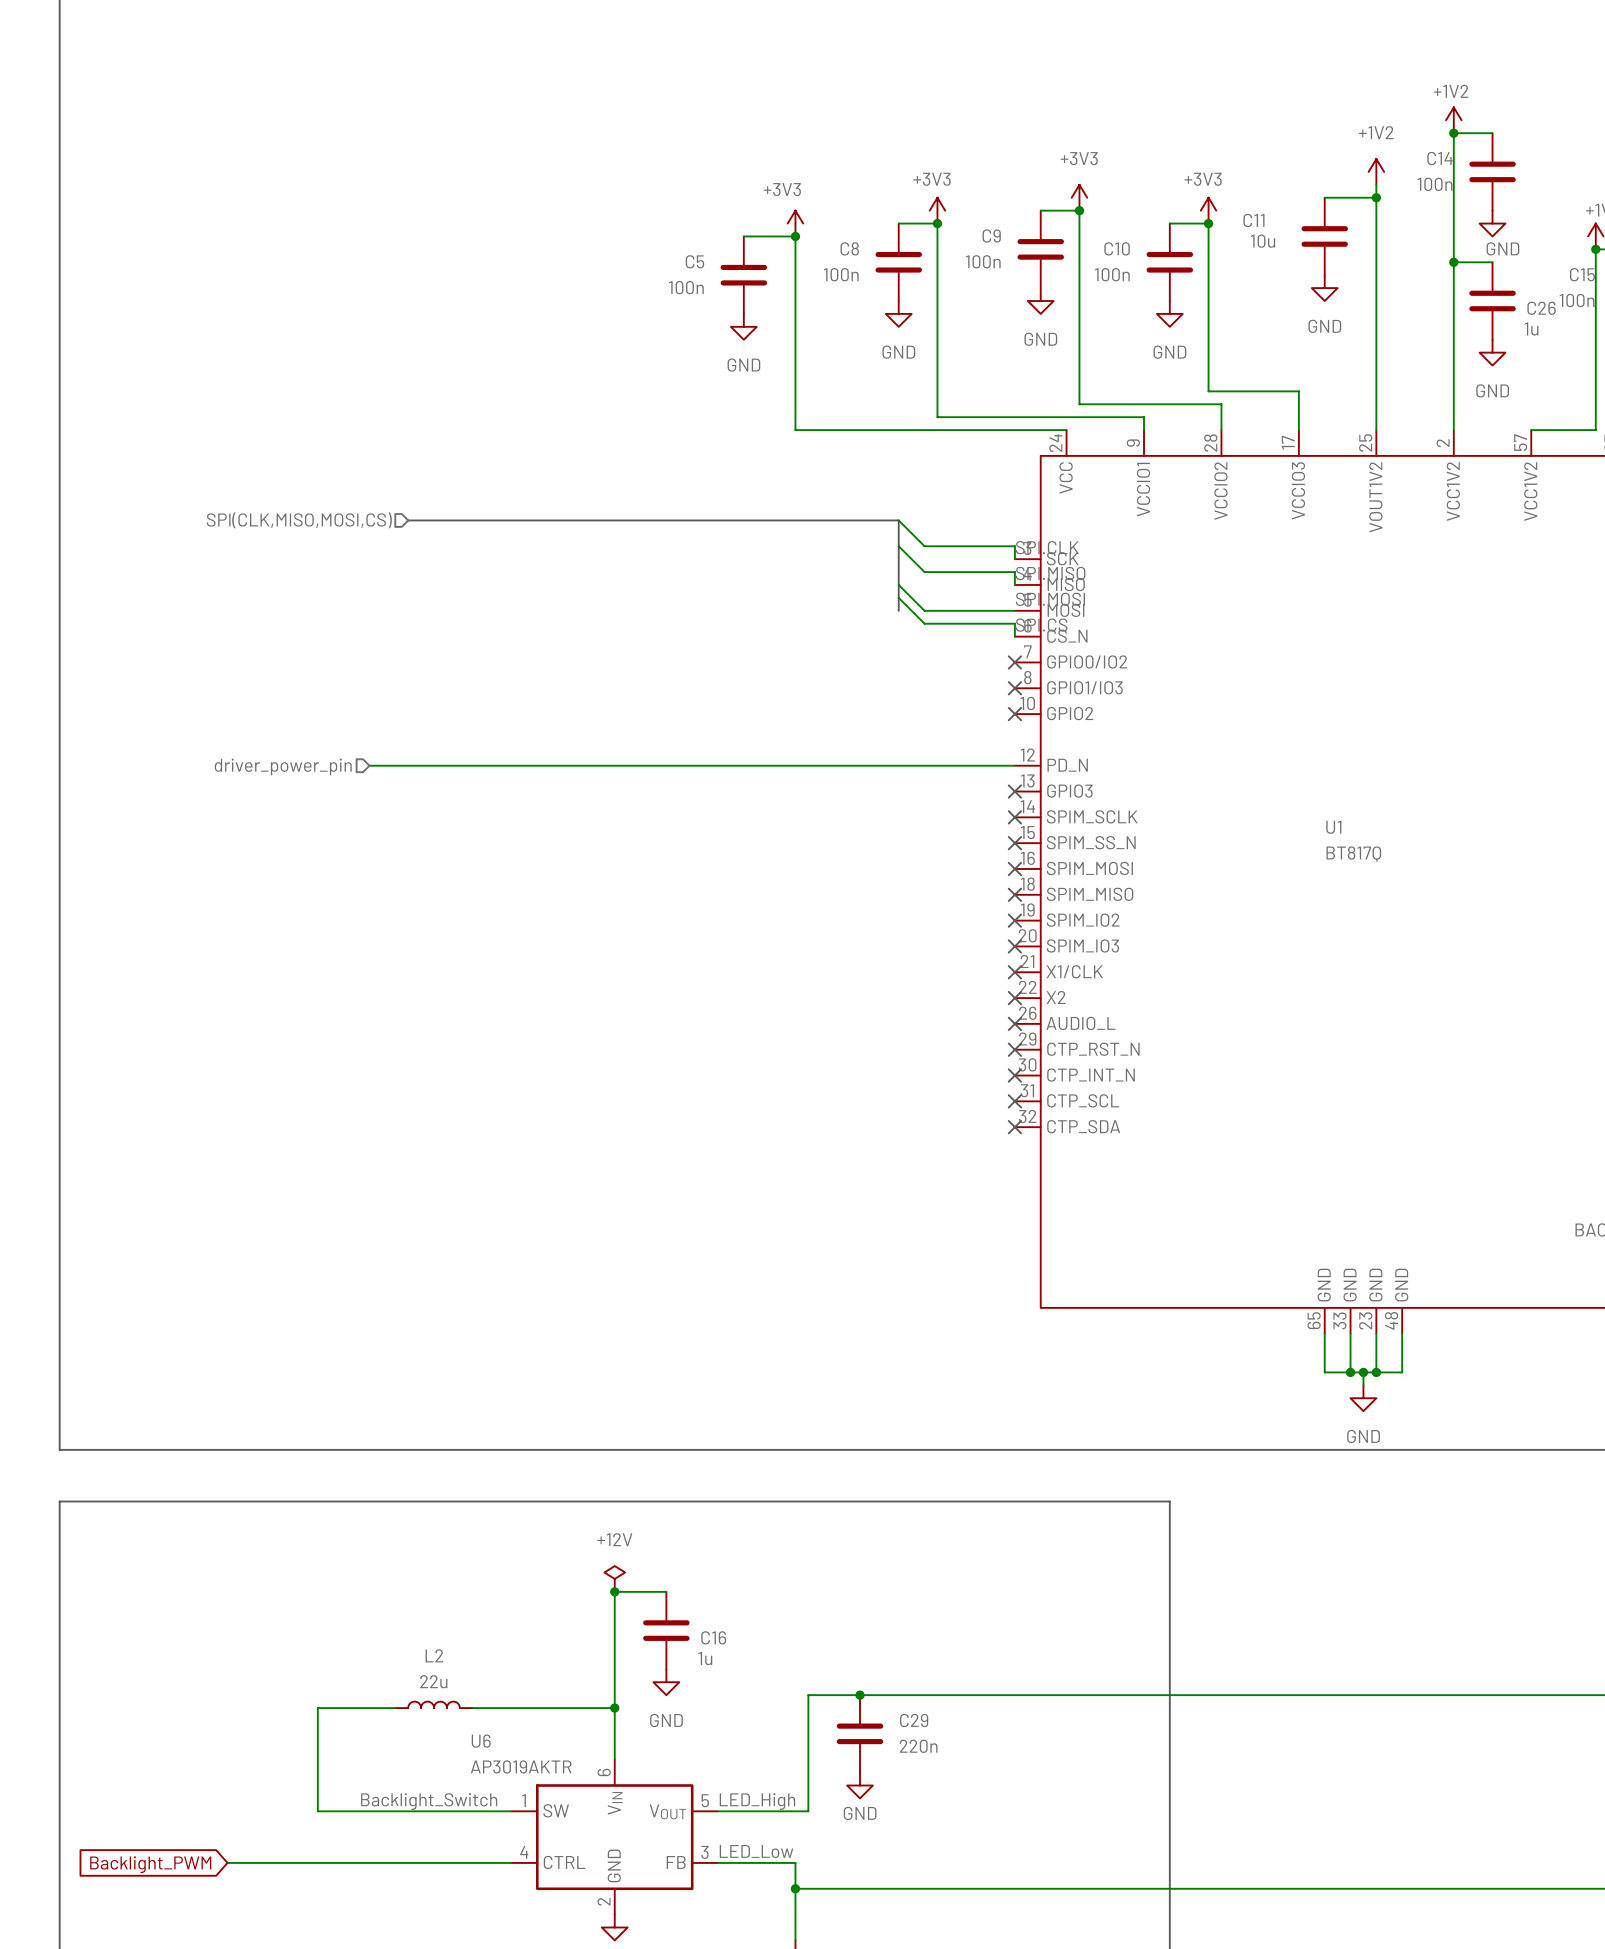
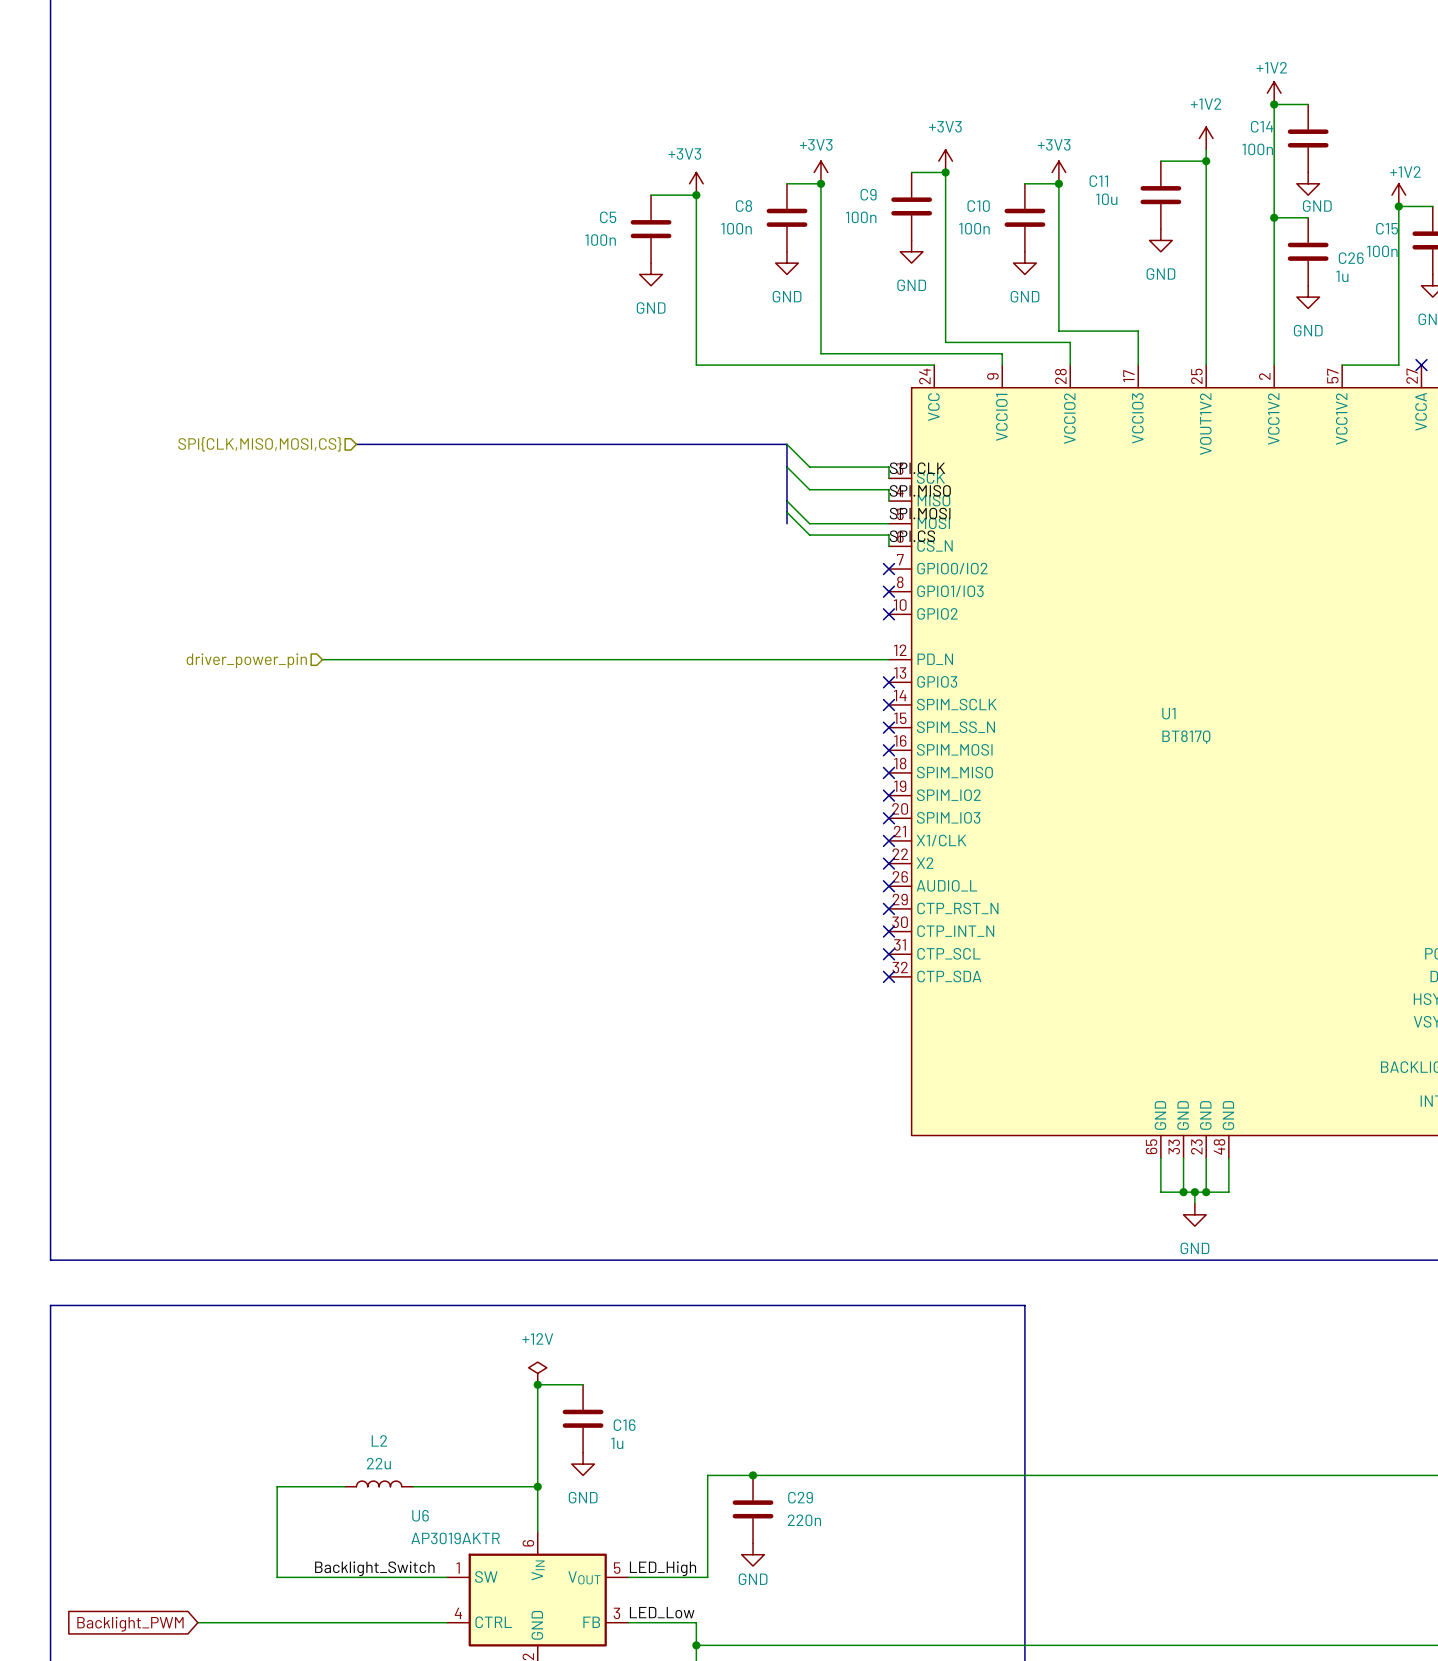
hierarchical label: SPI(CLK,MISO,MOSI,CS) (299, 520) -> SPI{CLK,MISO,MOSI,CS} (259, 444)

